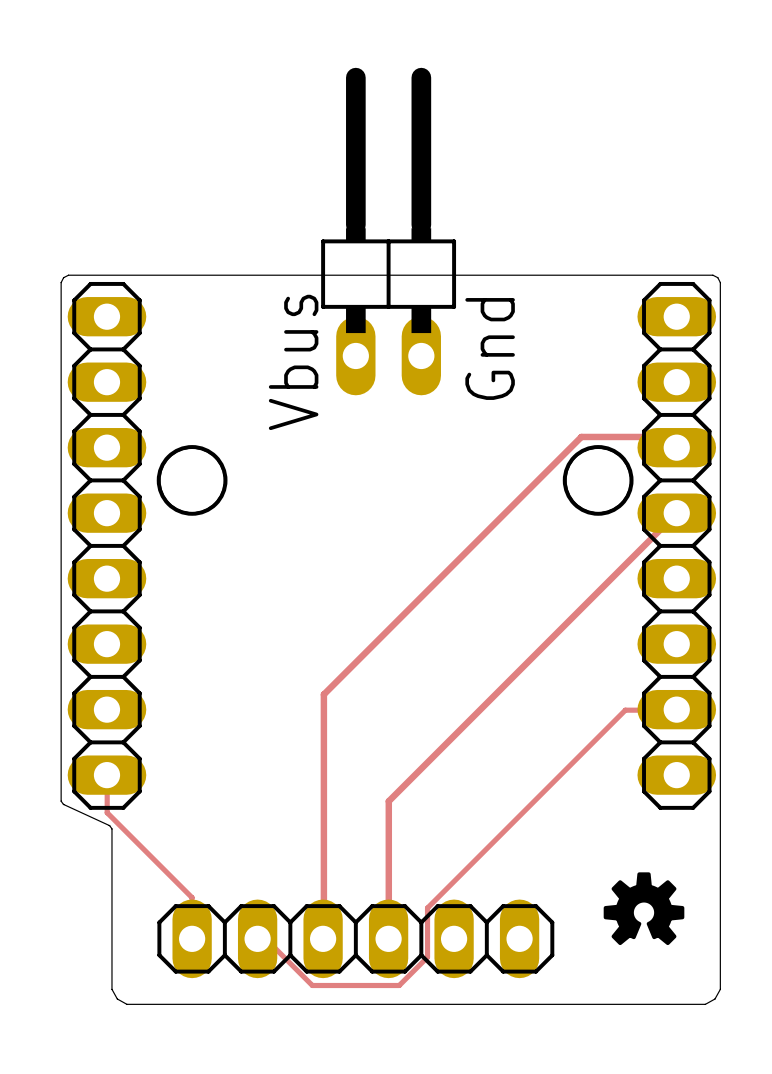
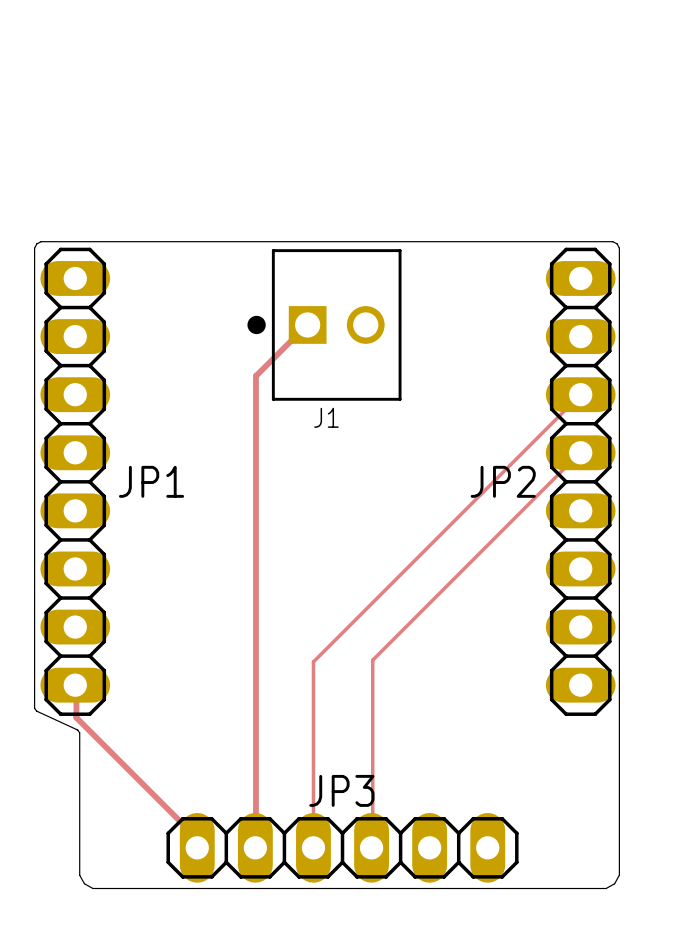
part: (388, 231) -> none
text: Gnd (490, 348) -> none
text: Vbus (293, 362) -> none
track: none -> (307, 324) (255, 376) (255, 847)
J1: none -> (324, 324)
round board edge: [156, 445, 228, 516] -> none
round board edge: [562, 445, 634, 516] -> none
track: (676, 447) (666, 436) (581, 436) (323, 694) (323, 938) -> (580, 394) (313, 661) (313, 847)
track: (676, 513) (388, 801) (388, 938) -> (580, 452) (372, 660) (371, 847)
JP1 name: none -> JP1 (151, 481)
JP2 name: none -> JP2 (503, 481)
track: (676, 709) (625, 710) (427, 908) (427, 957) (399, 985) (312, 985) (266, 939) (257, 938) -> none
track: (106, 775) (107, 812) (191, 897) (191, 938) -> (75, 685) (76, 717) (196, 837) (197, 847)
drawing: [603, 872, 685, 946] -> none
part: (355, 938) -> none
JP3: none -> (342, 847)

